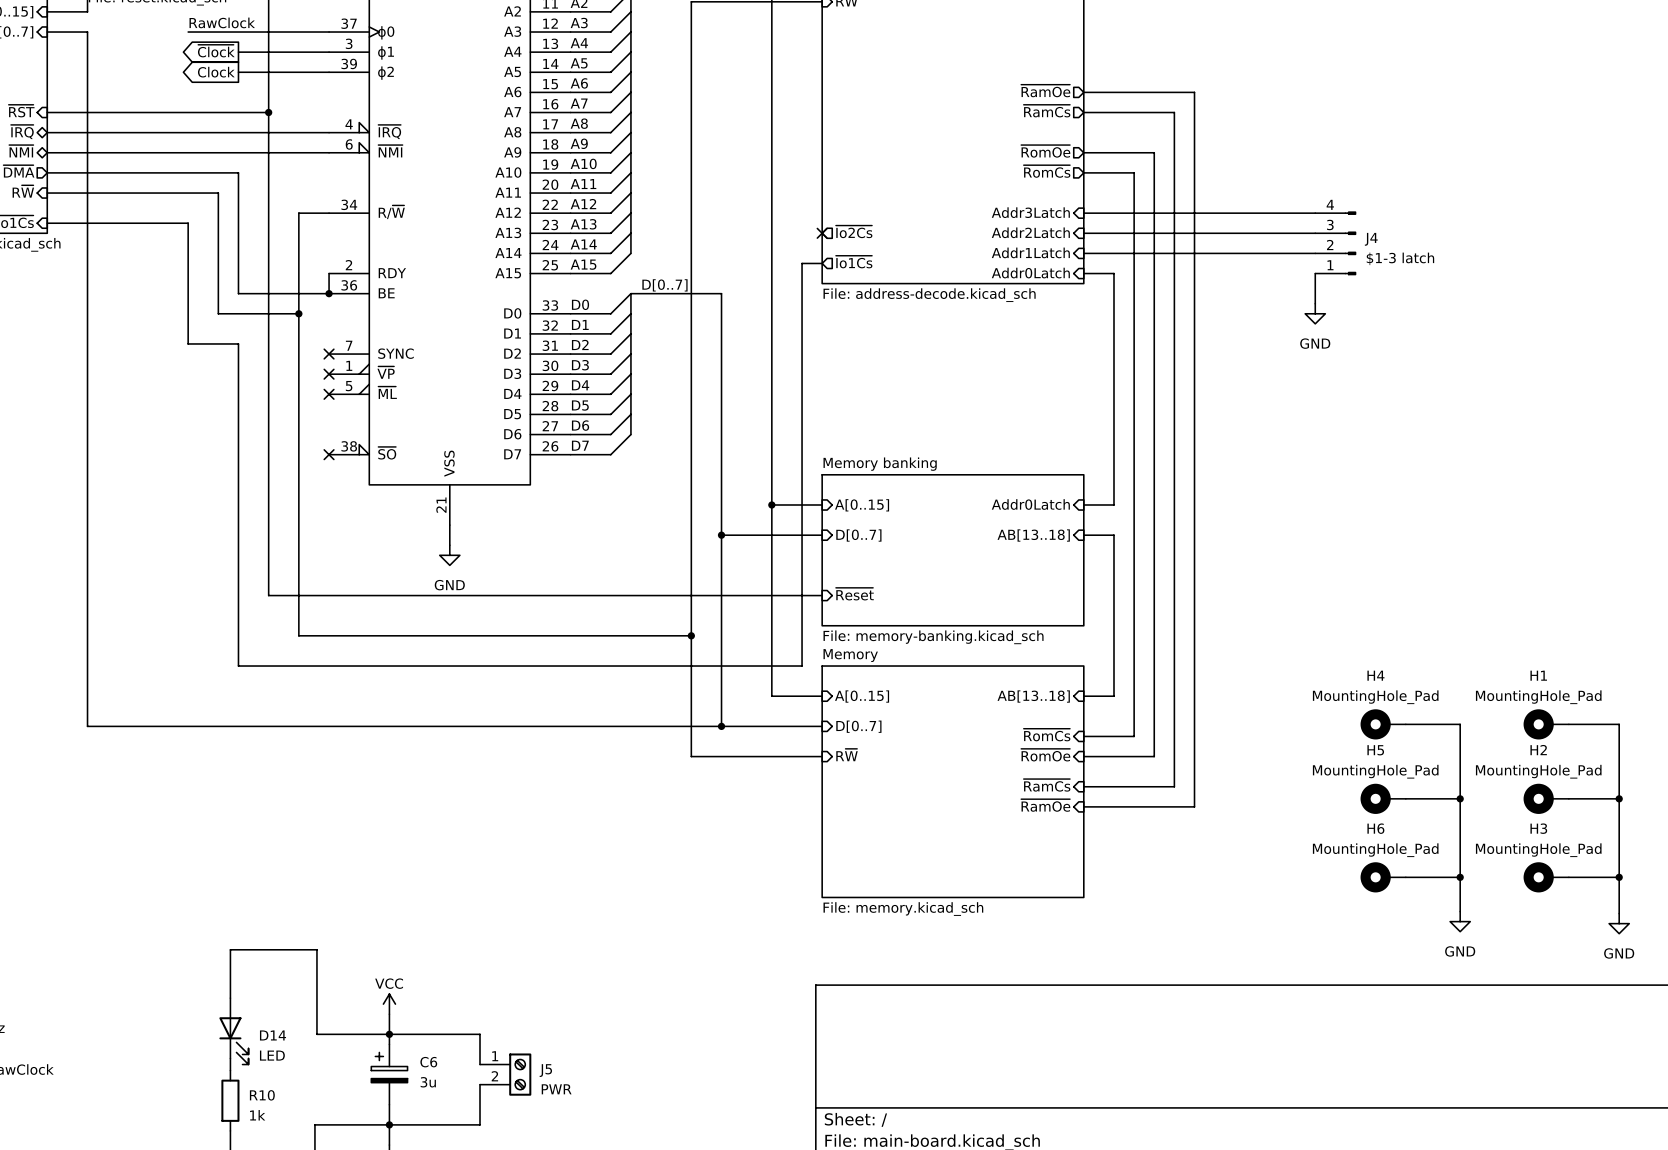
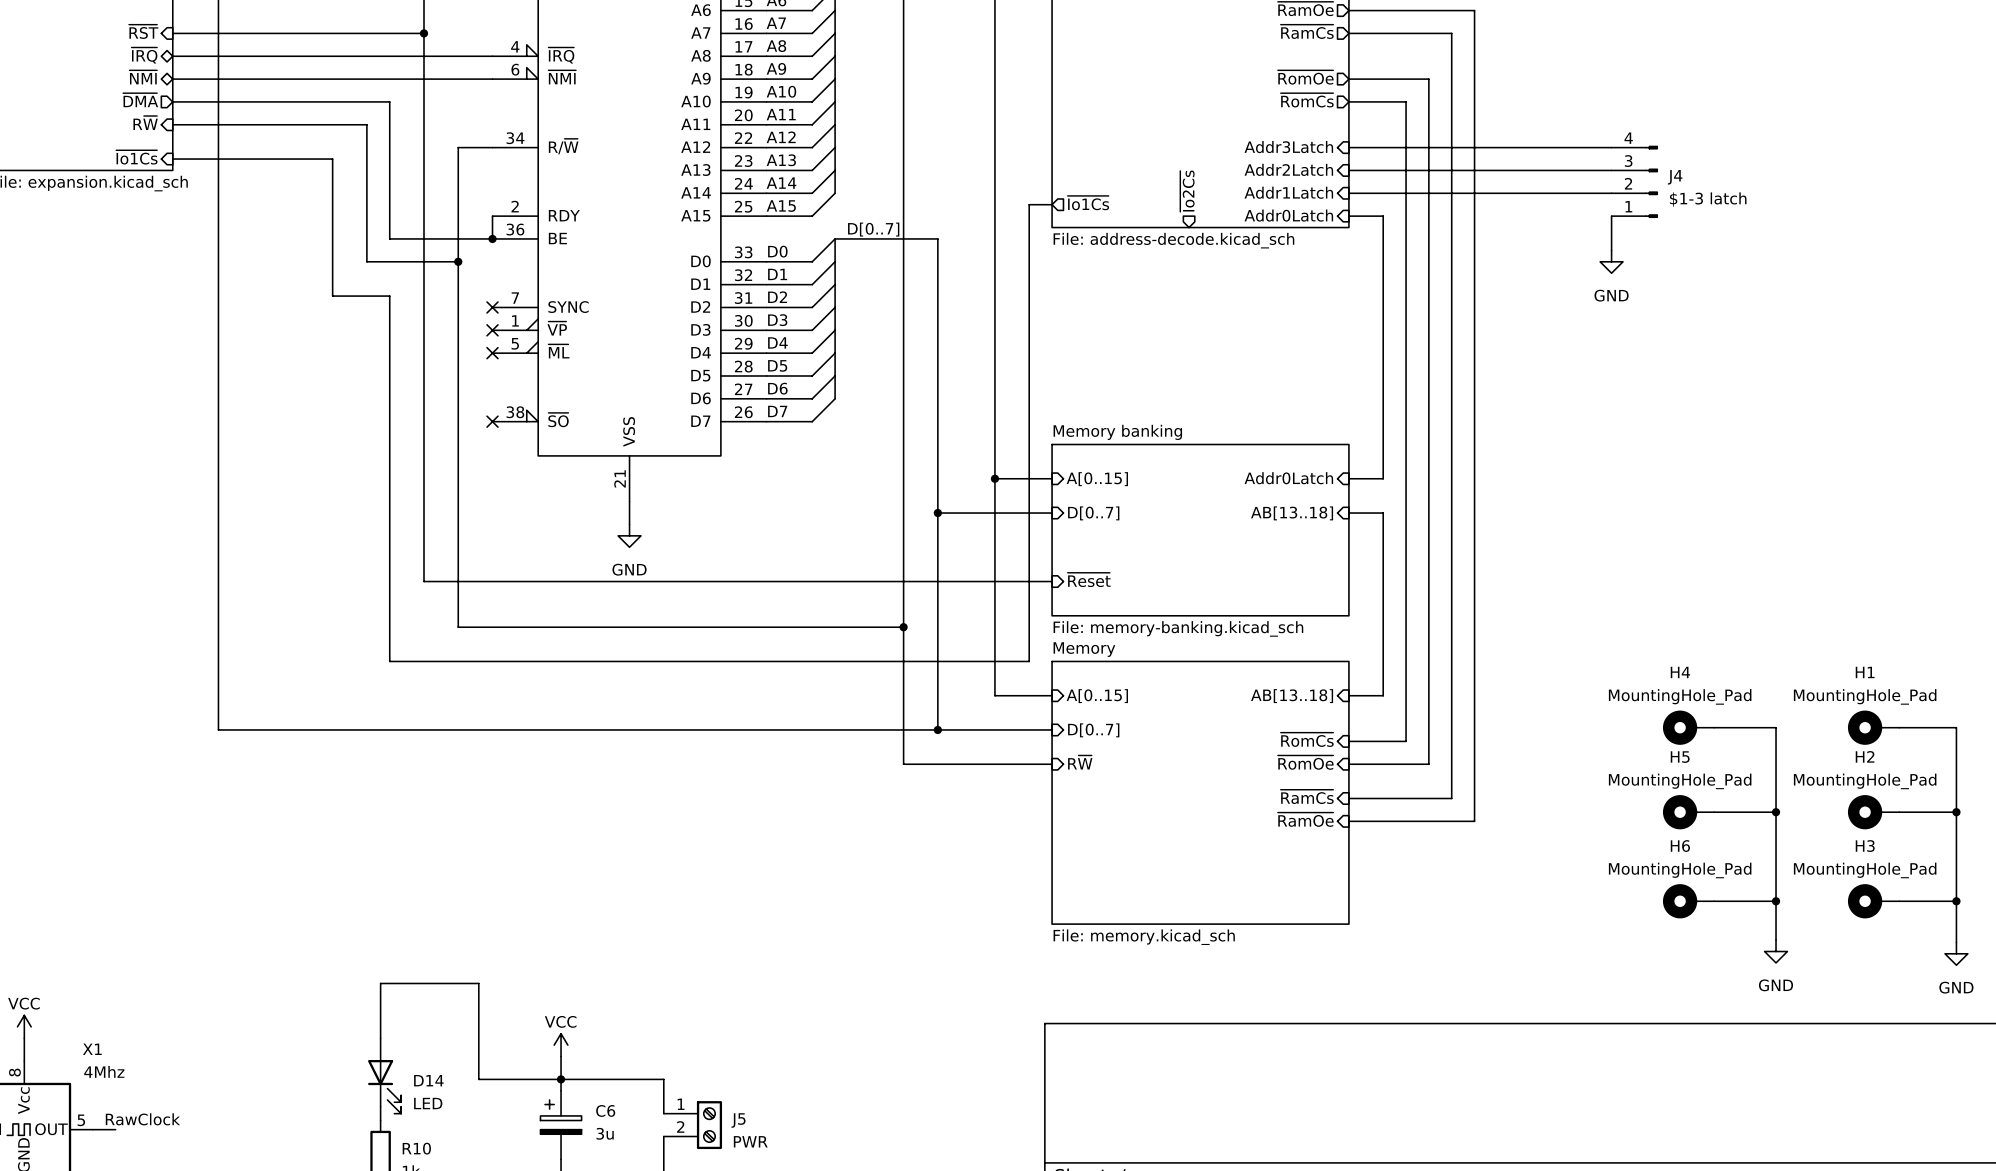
sheet pin rotation: 0° (854, 231) -> 90° counterclockwise (1187, 191)
no-connect mark: (822, 233) -> none

